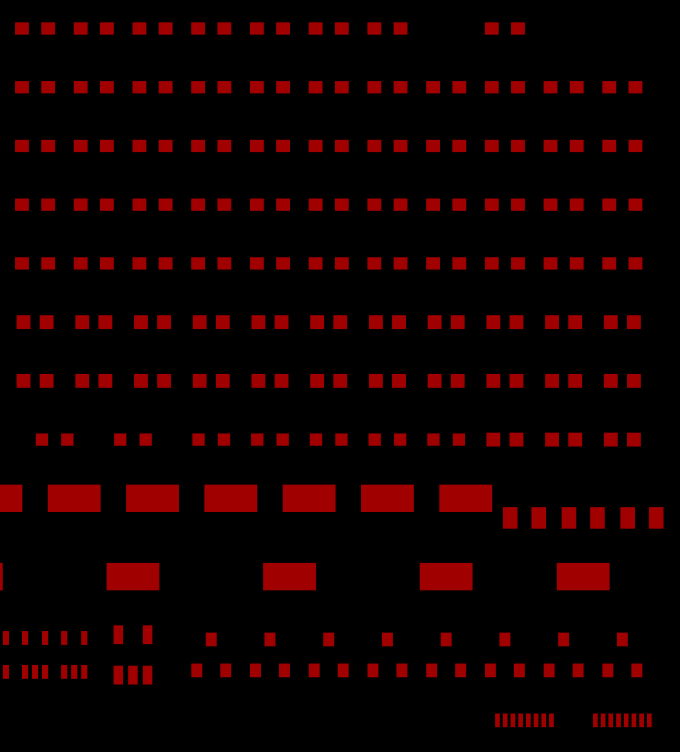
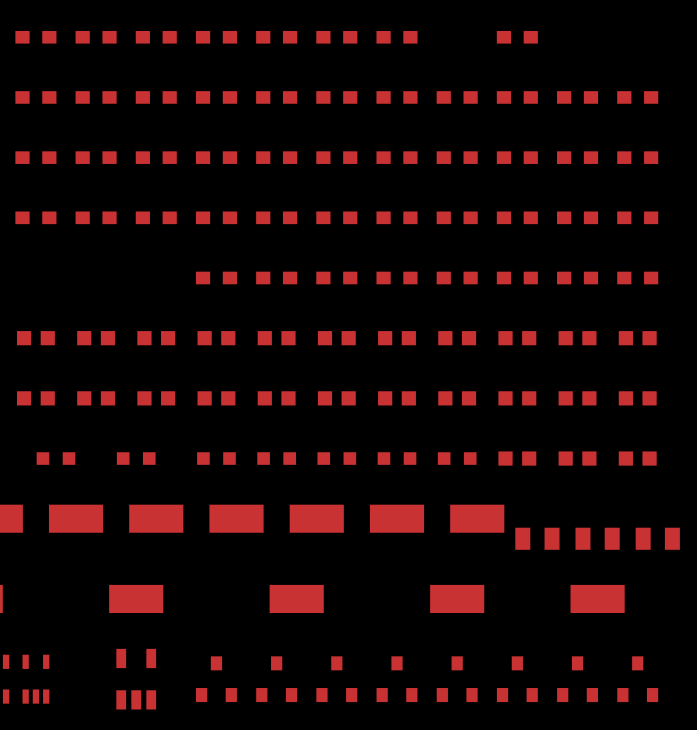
part: (35, 263) -> none
part: (93, 263) -> none
part: (152, 263) -> none
part: (74, 654) -> none

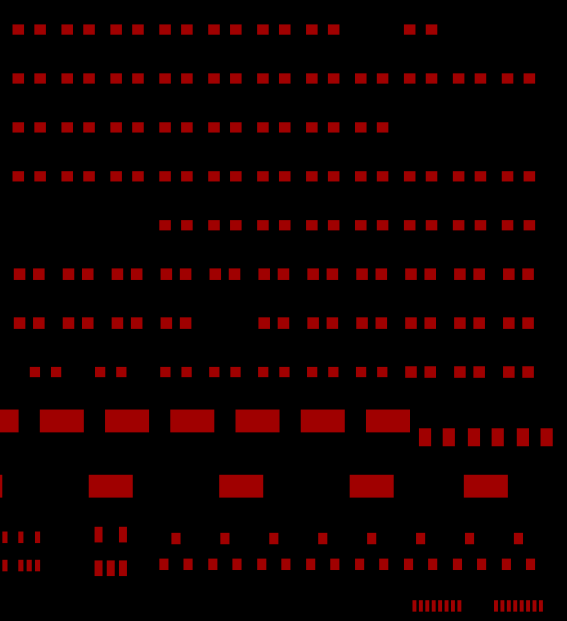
part: (517, 157) -> none
part: (577, 157) -> none
part: (637, 157) -> none
part: (276, 398) -> none

